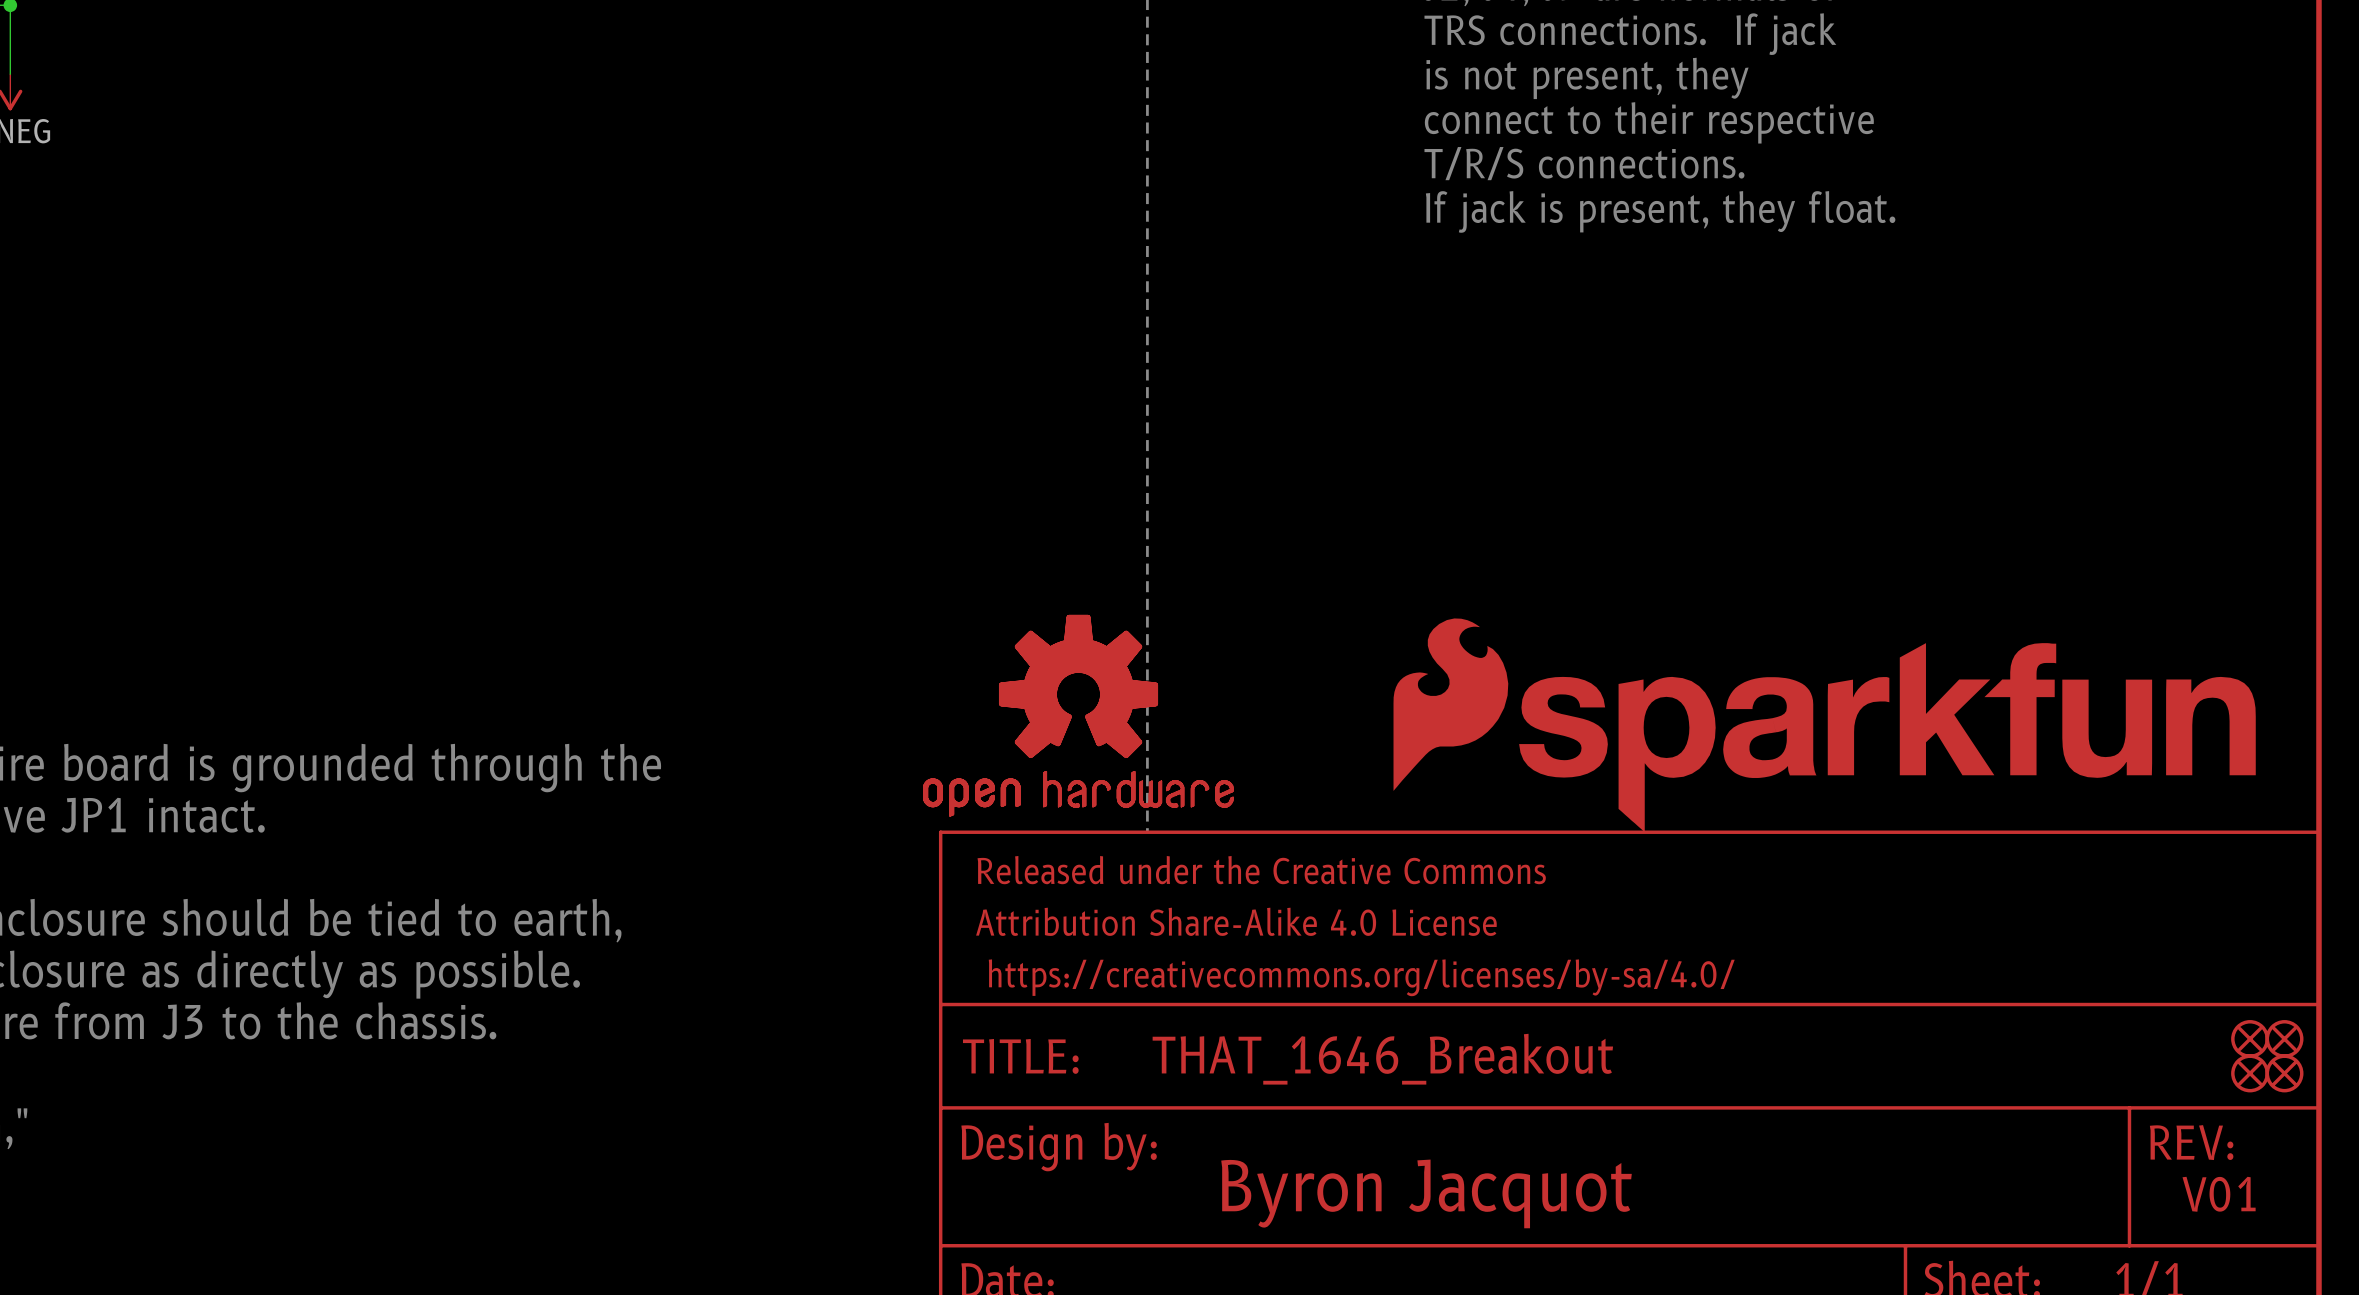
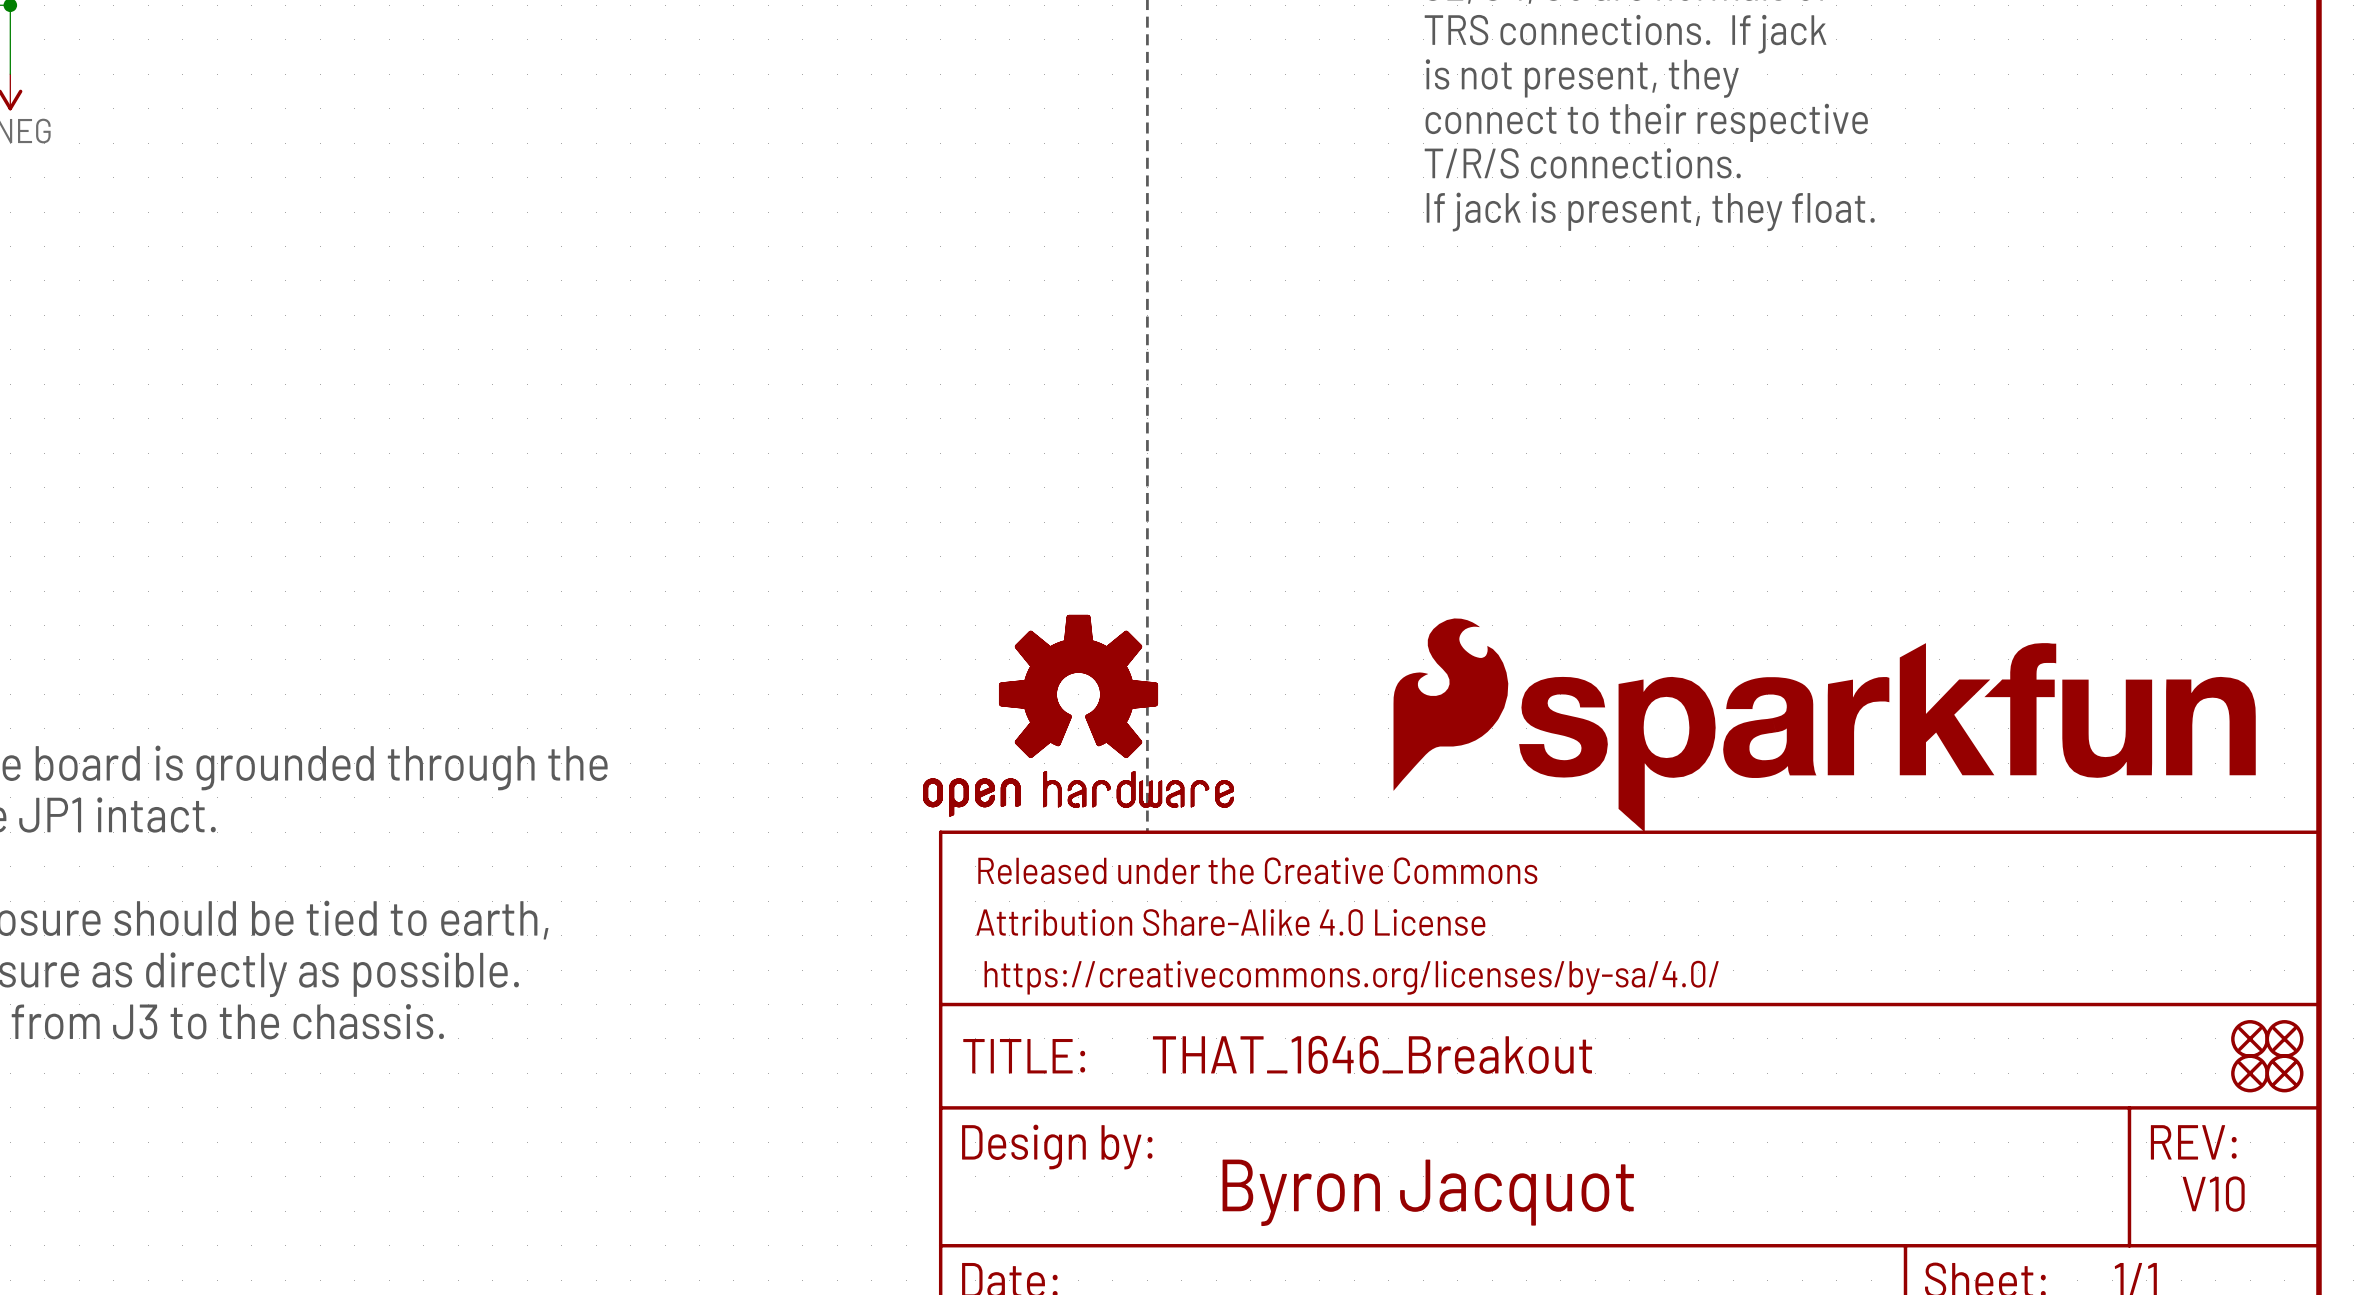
text: V01 (2219, 1194) -> V10 (2213, 1194)

